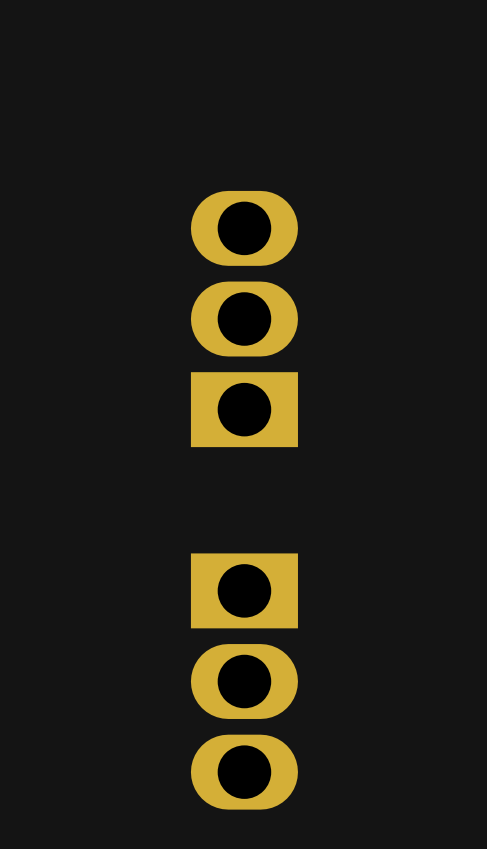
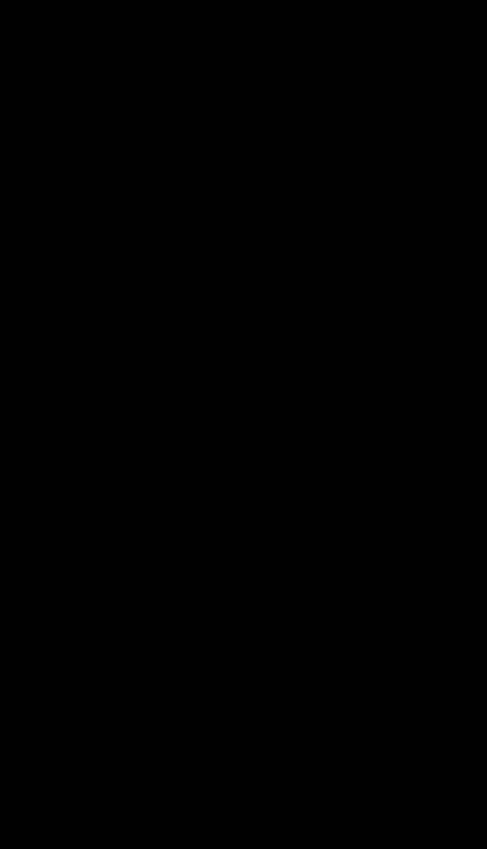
part: (244, 319) -> none
part: (244, 681) -> none

